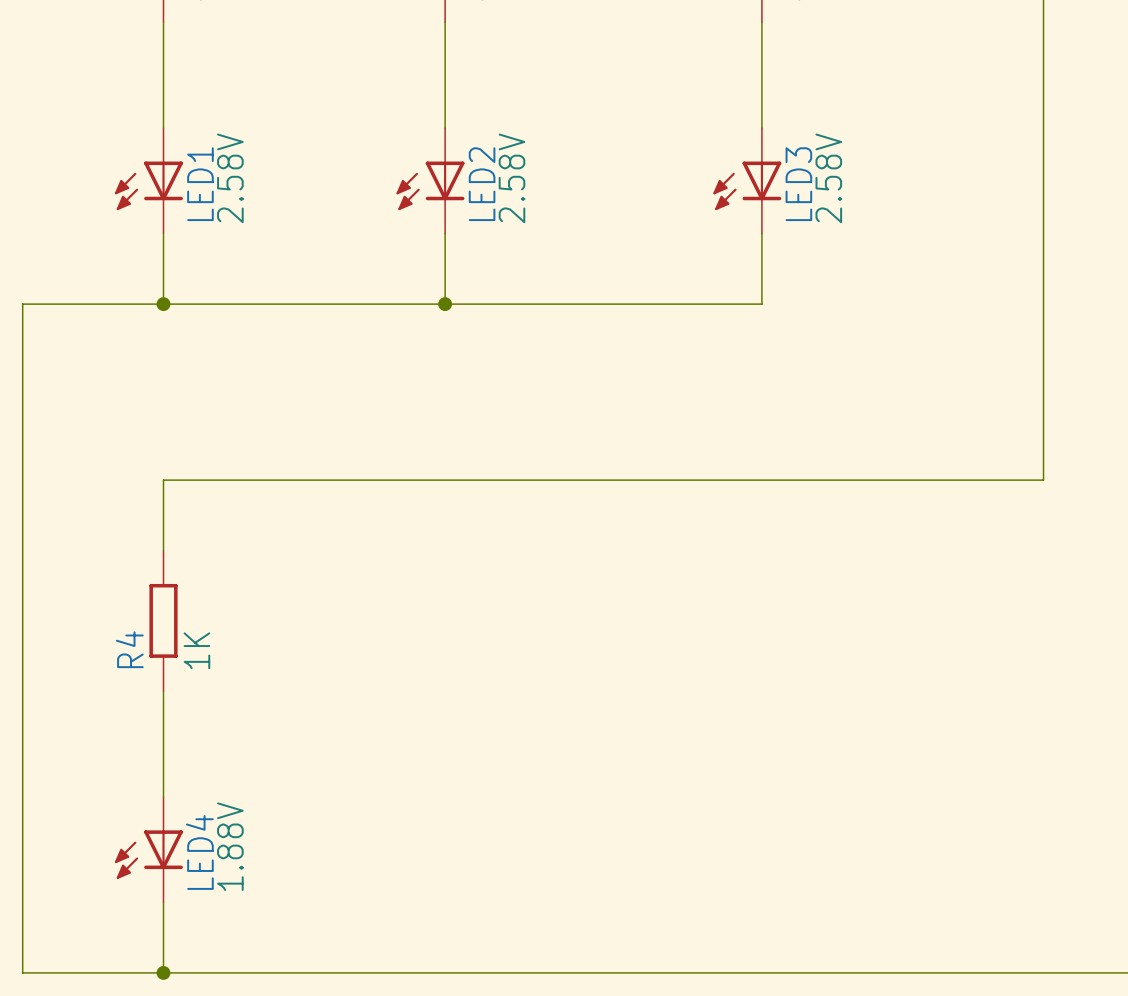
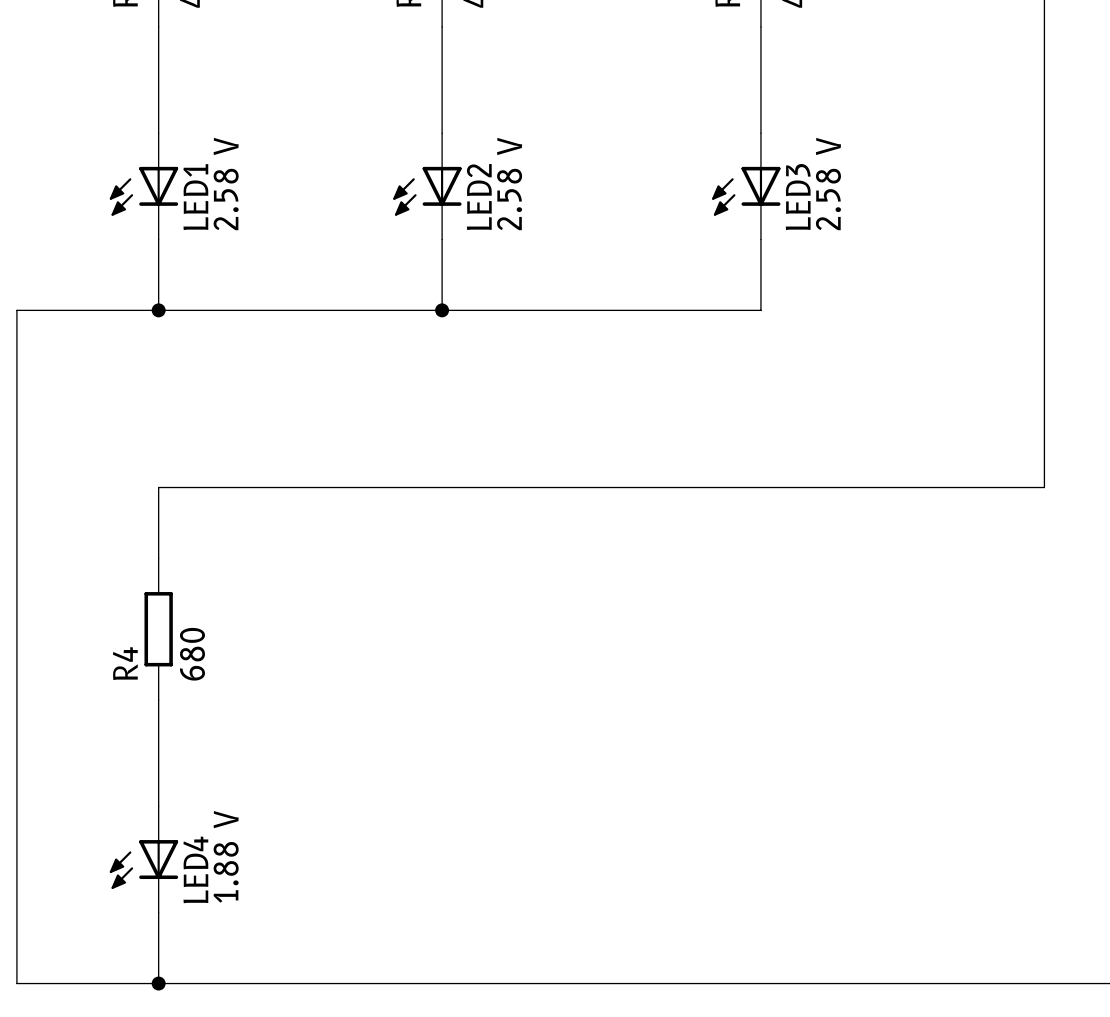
LED1 value: 2.58V (230, 178) -> 2.58 V (226, 184)
LED2 value: 2.58V (511, 178) -> 2.58 V (509, 184)
LED3 value: 2.58V (828, 178) -> 2.58 V (828, 184)
R4 value: 1K (196, 650) -> 680 (192, 654)
LED4 value: 1.88V (230, 846) -> 1.88 V (226, 856)

